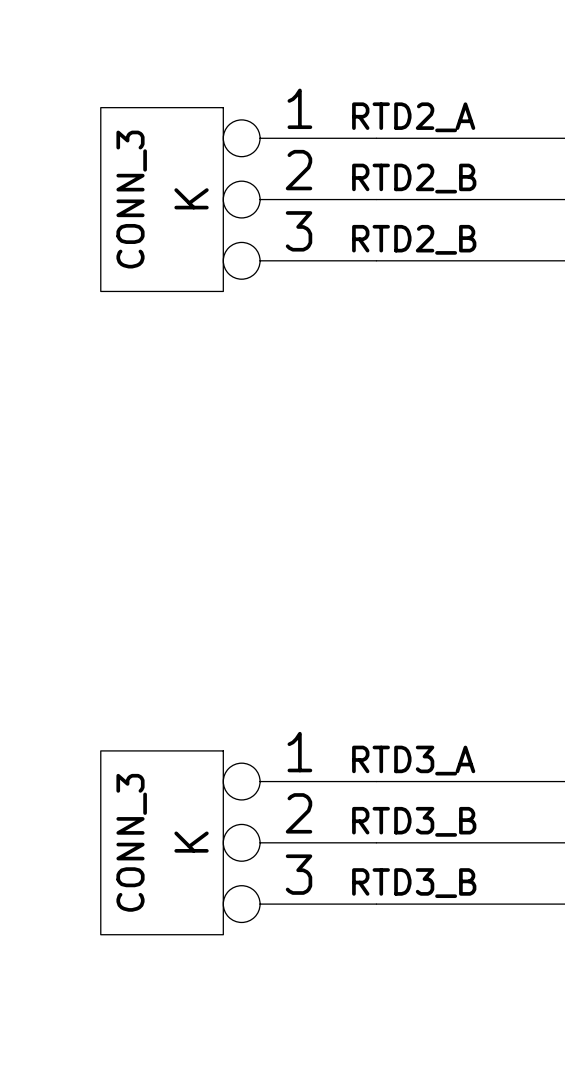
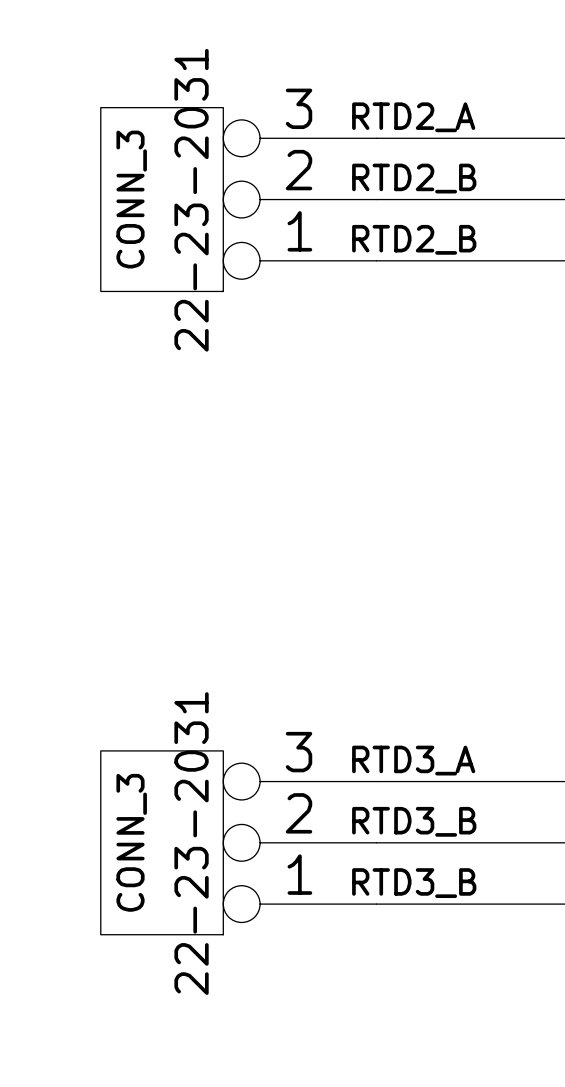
K name: K (191, 198) -> 22-23-2031 (191, 200)
K flip: as is (162, 199) -> up-down (162, 199)
K flip: as is (162, 842) -> up-down (162, 842)
K name: K (191, 842) -> 22-23-2031 (191, 843)

